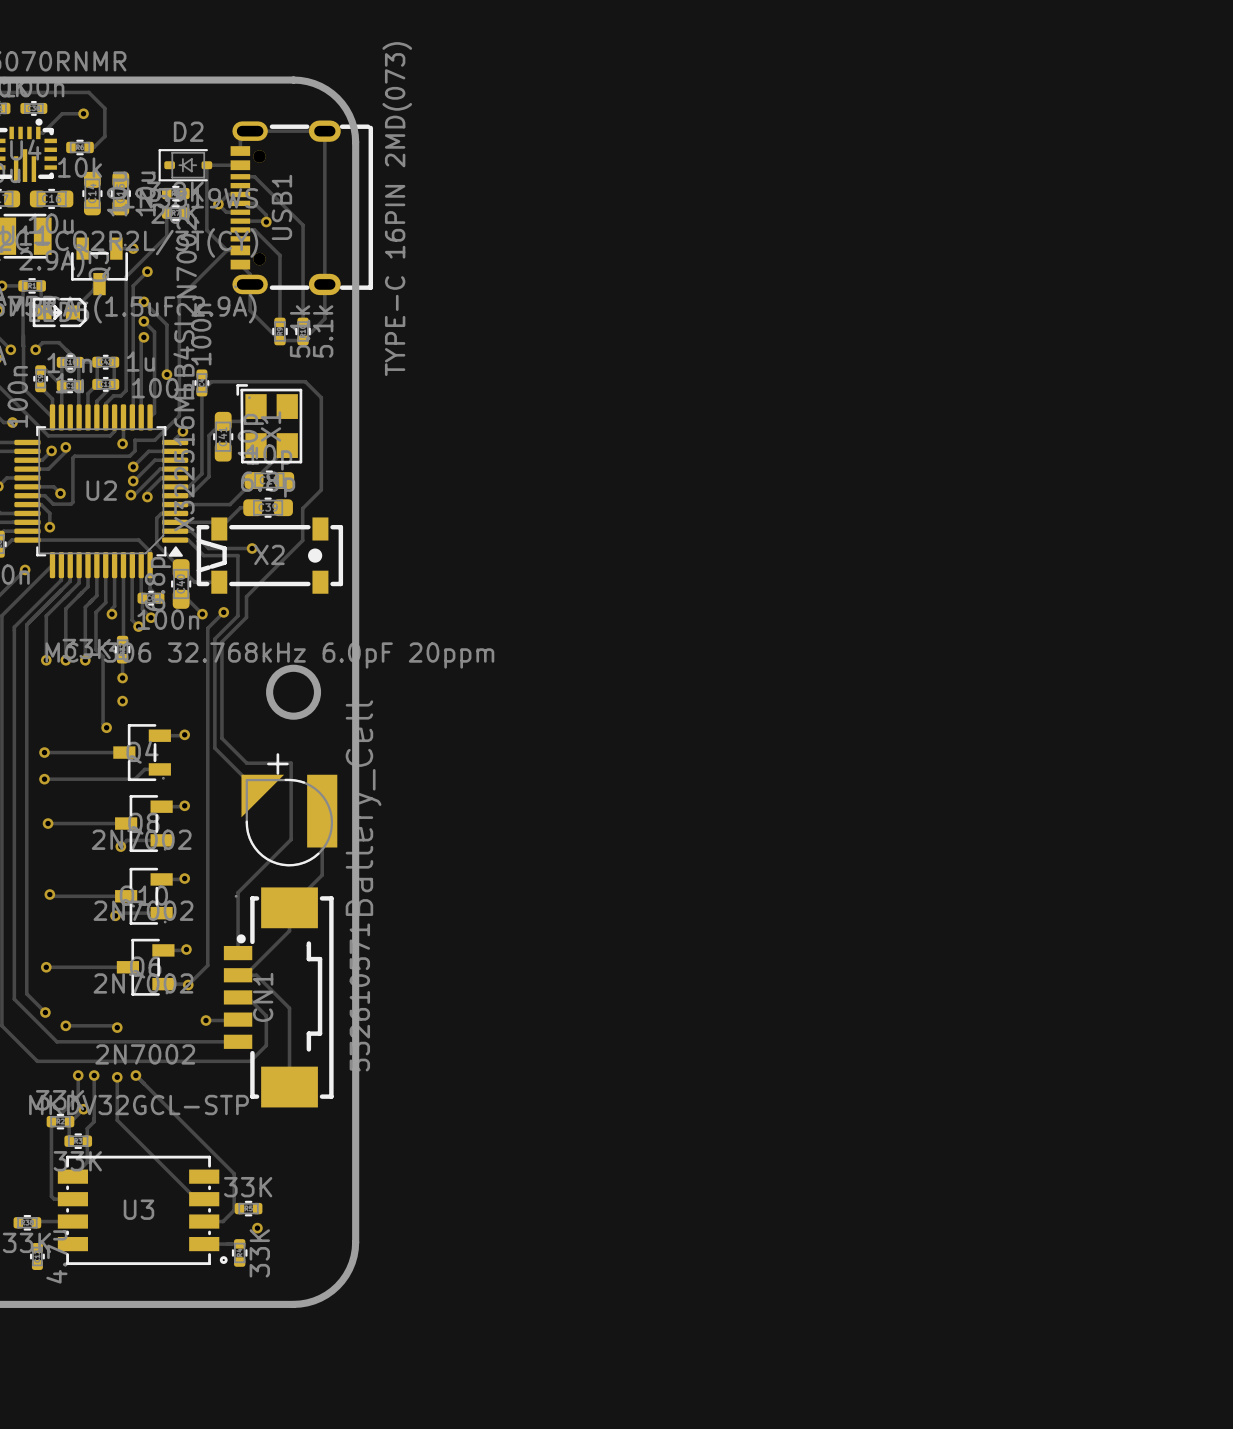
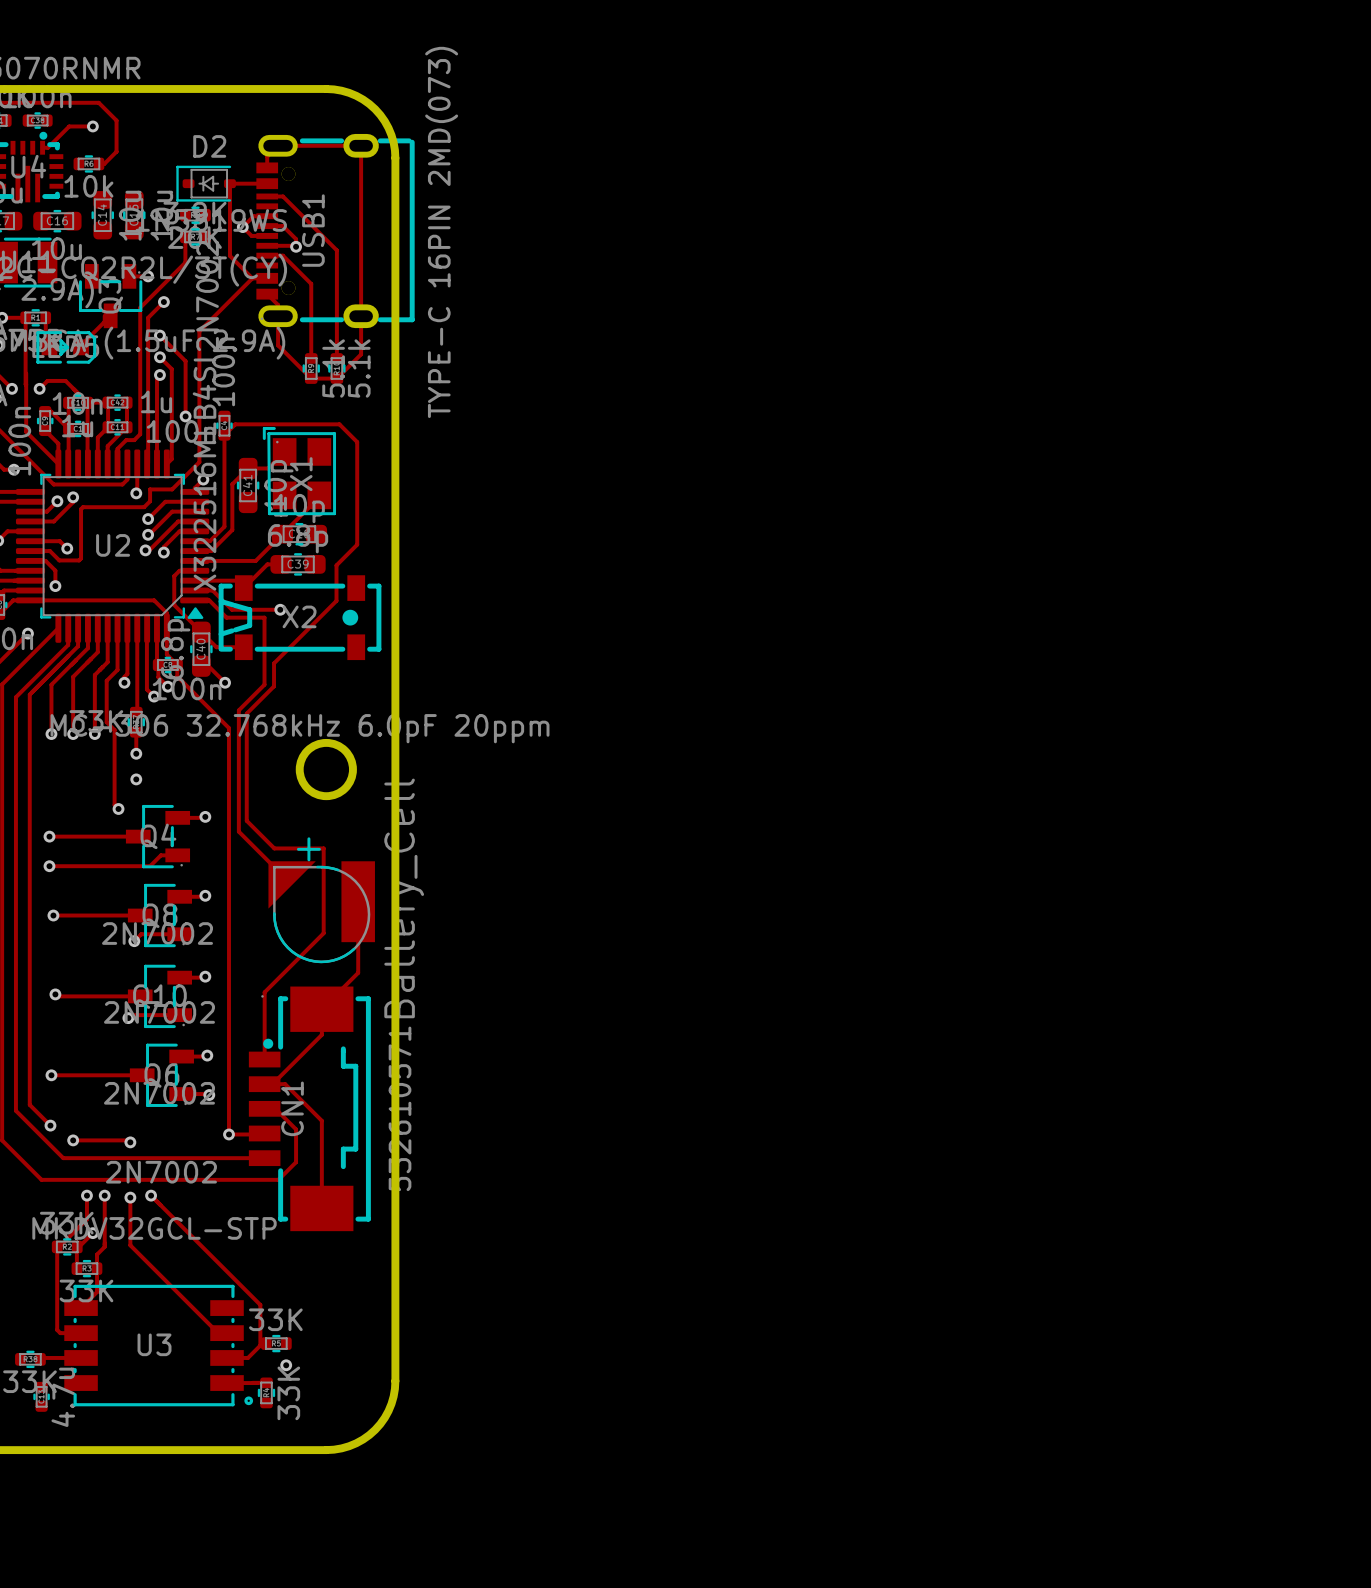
track: none -> (177, 664) (177, 676) (228, 728) (228, 1134)
track: (223, 612) (207, 628) (207, 965) (188, 985) -> none
via: (223, 612) -> none

